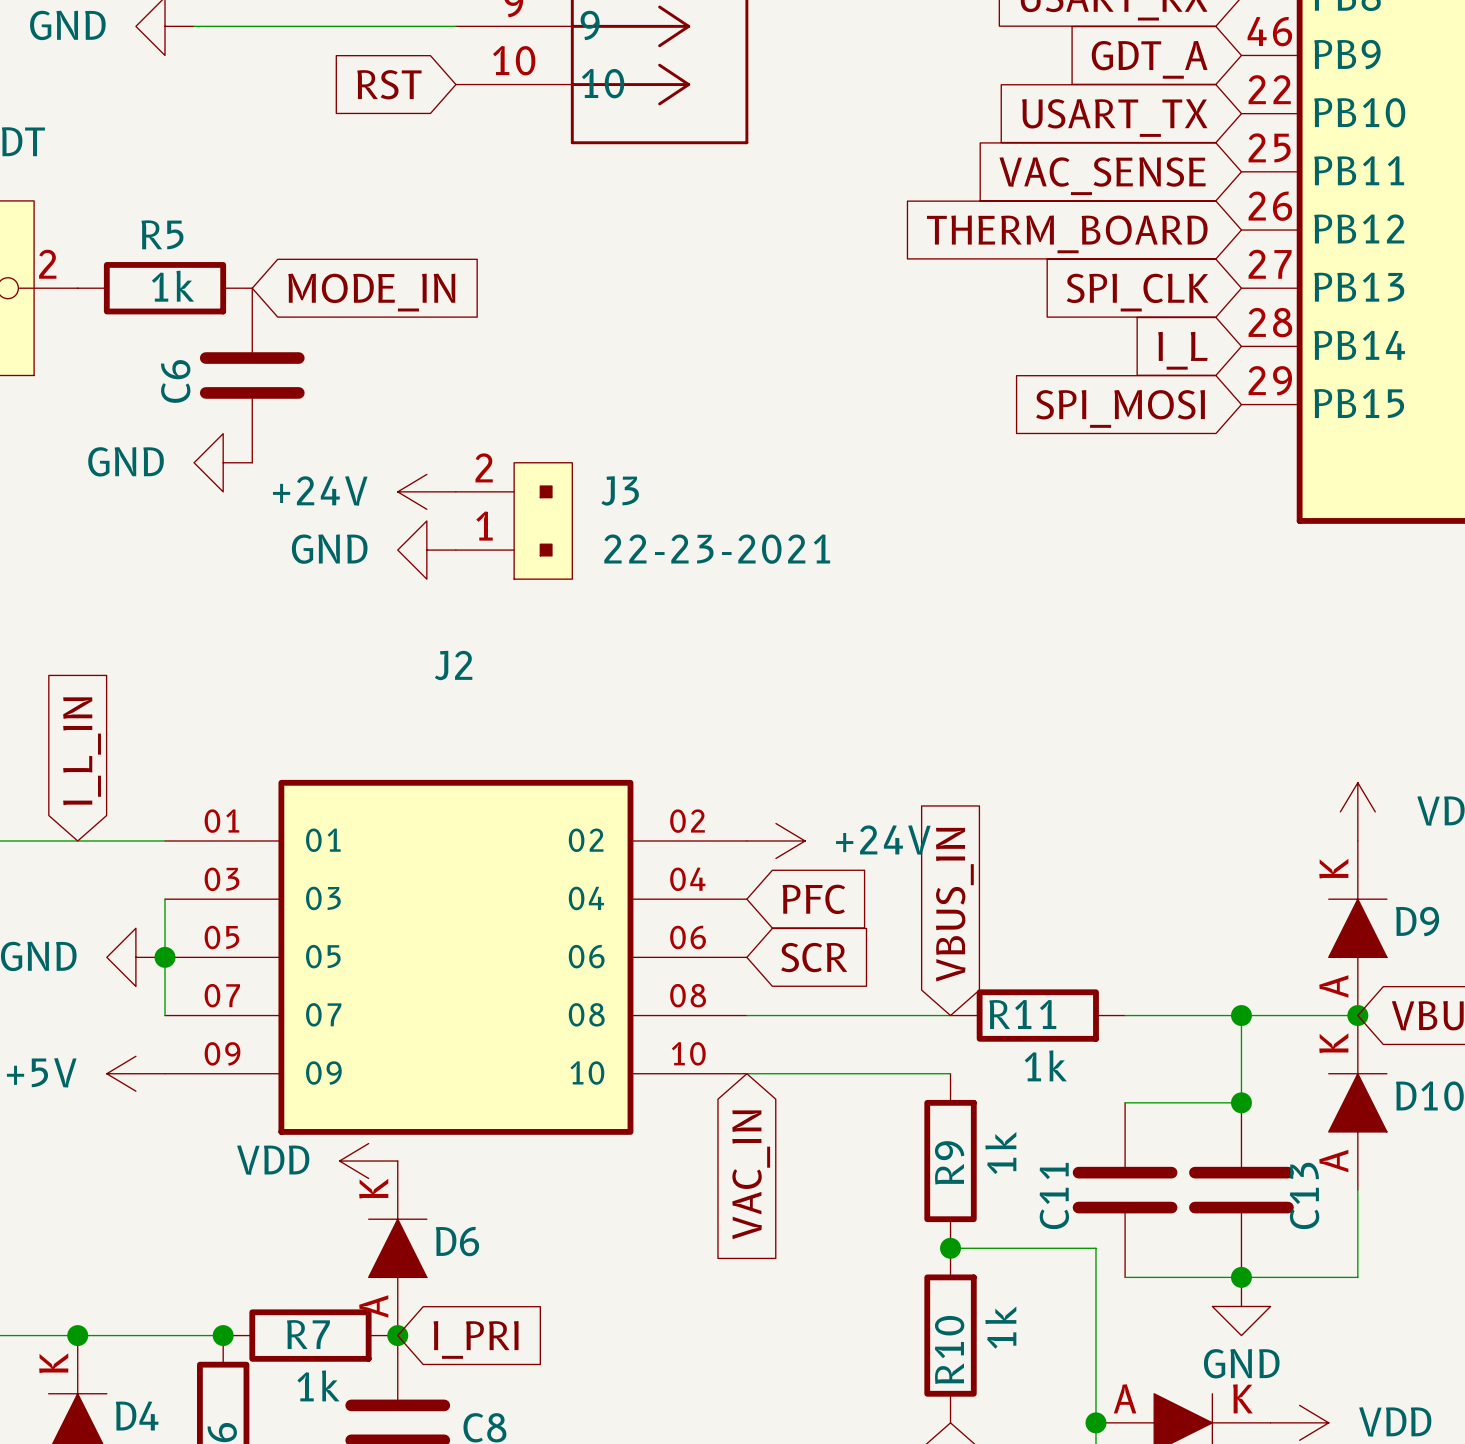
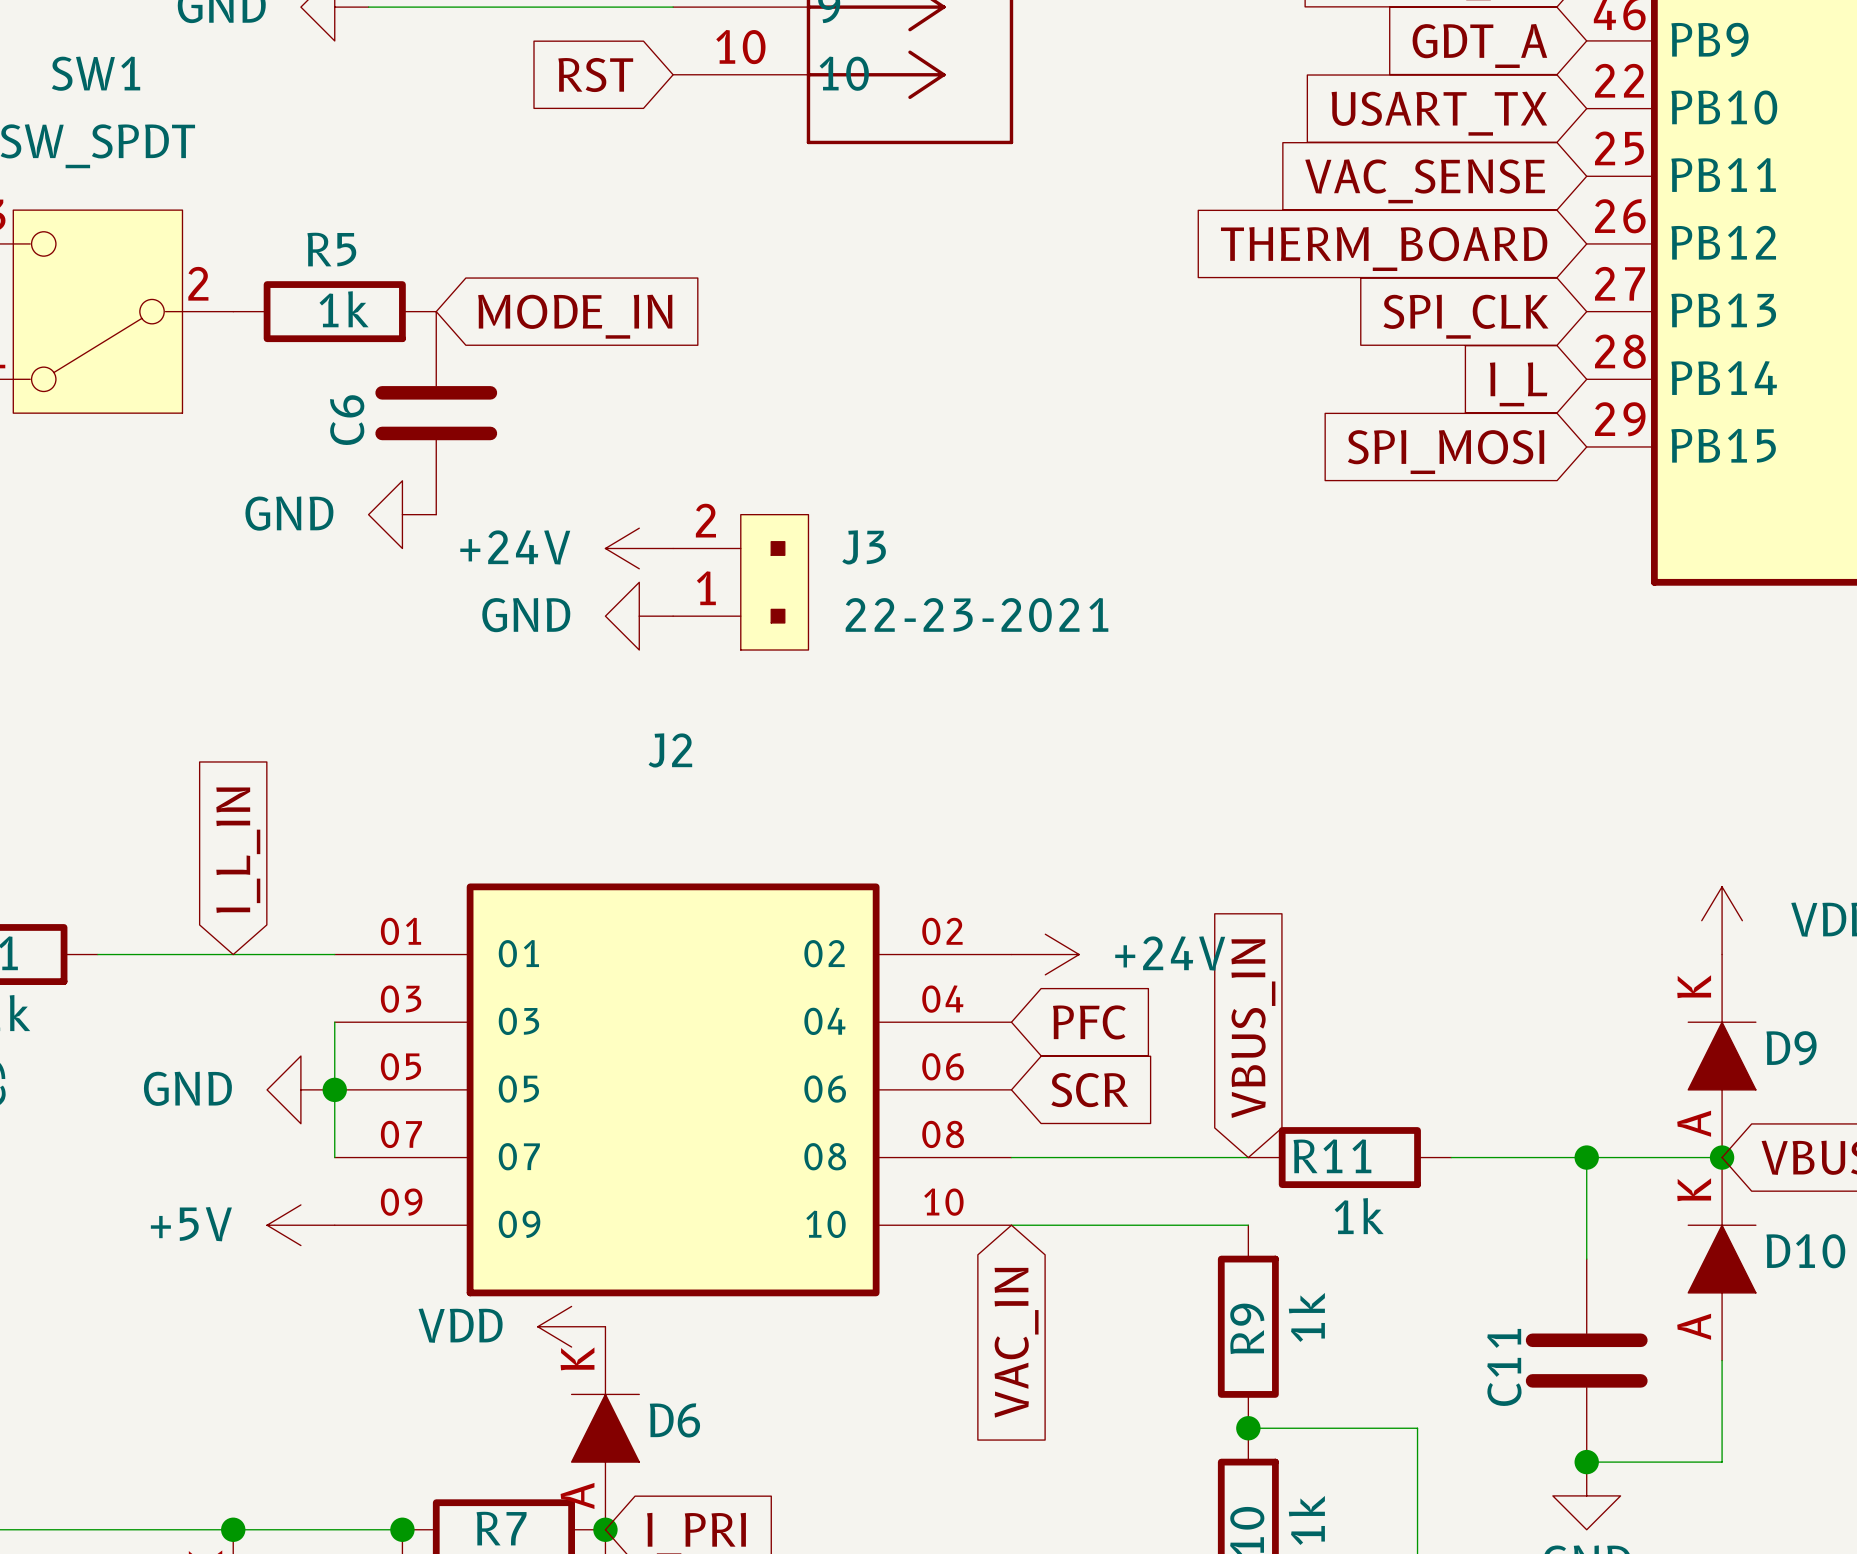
wire: (1125, 1102) (1241, 1102) -> none
junction: (1241, 1102) -> none
C11: (1125, 1190) -> none
C13 name: C13 (1304, 1195) -> C11 (1504, 1367)
wire: (1125, 1277) (1241, 1277) -> none

